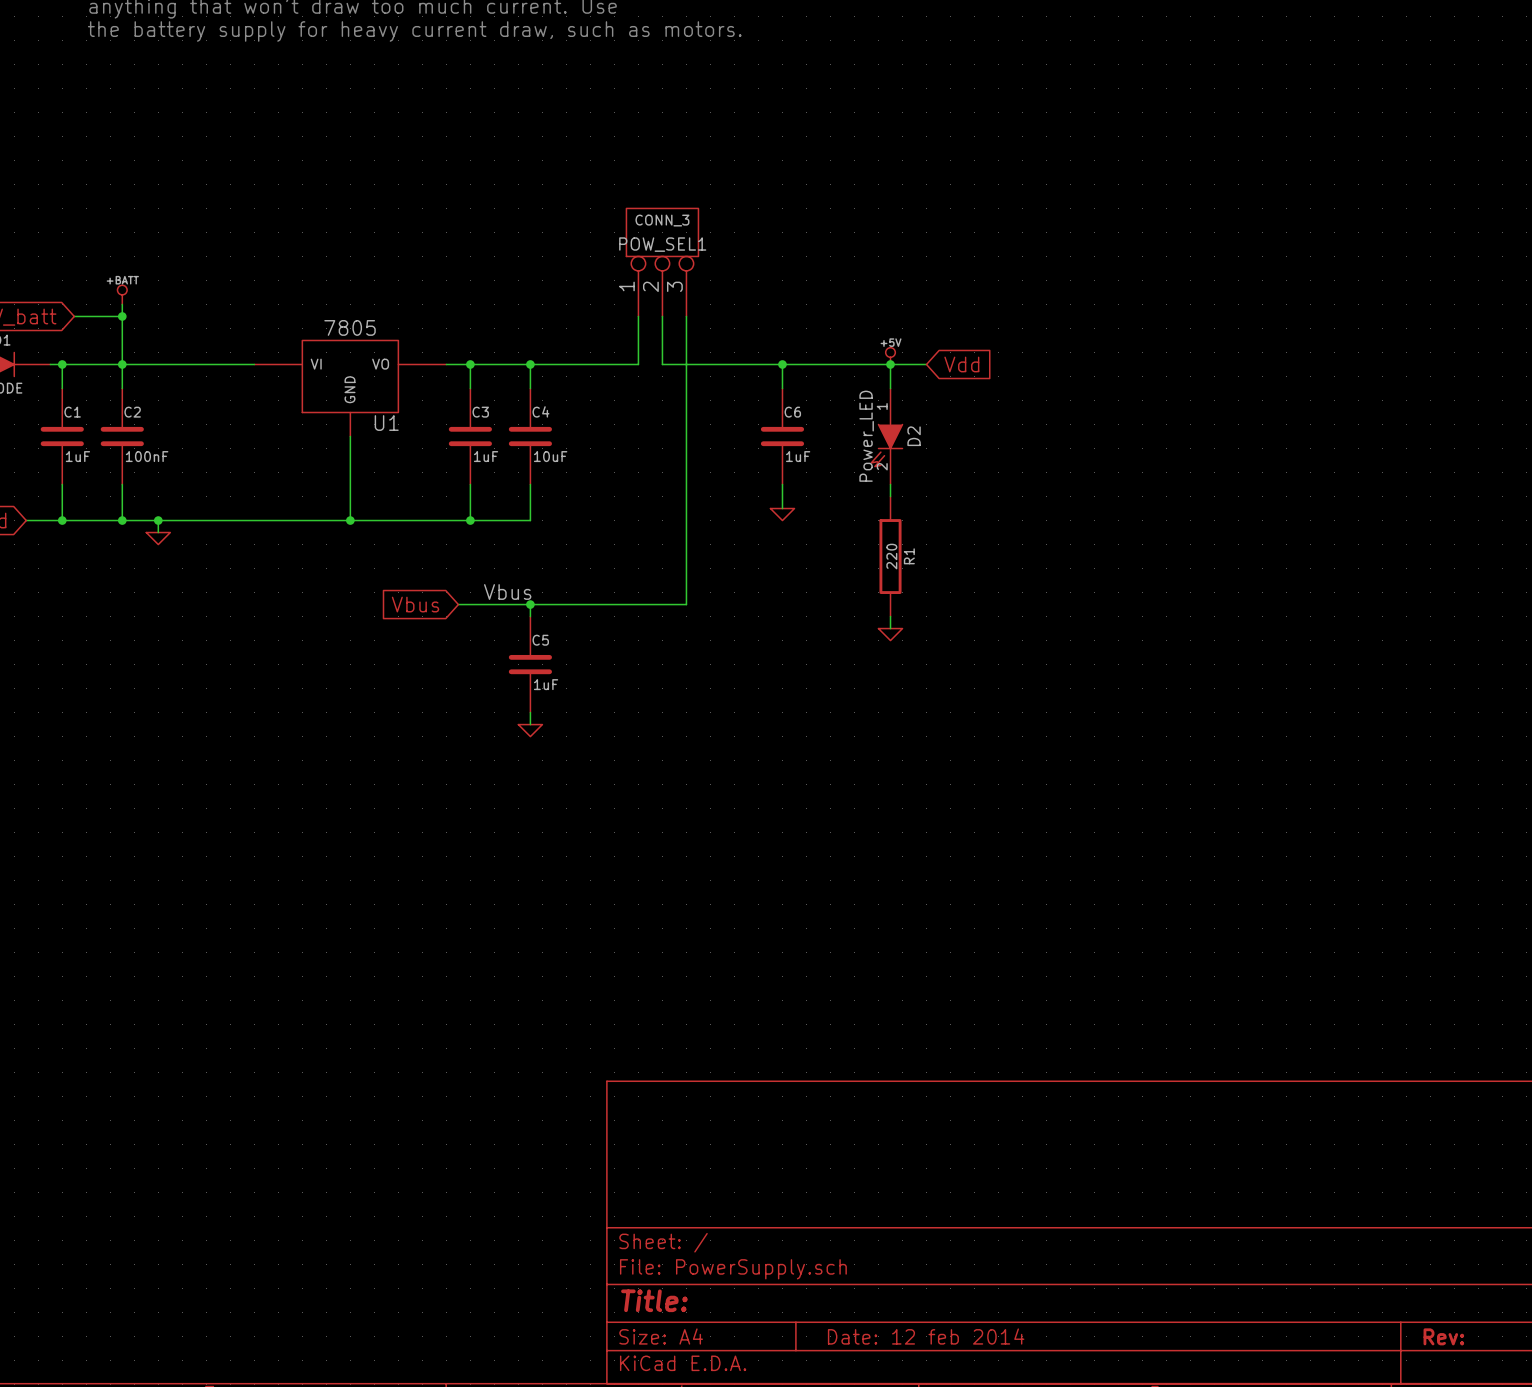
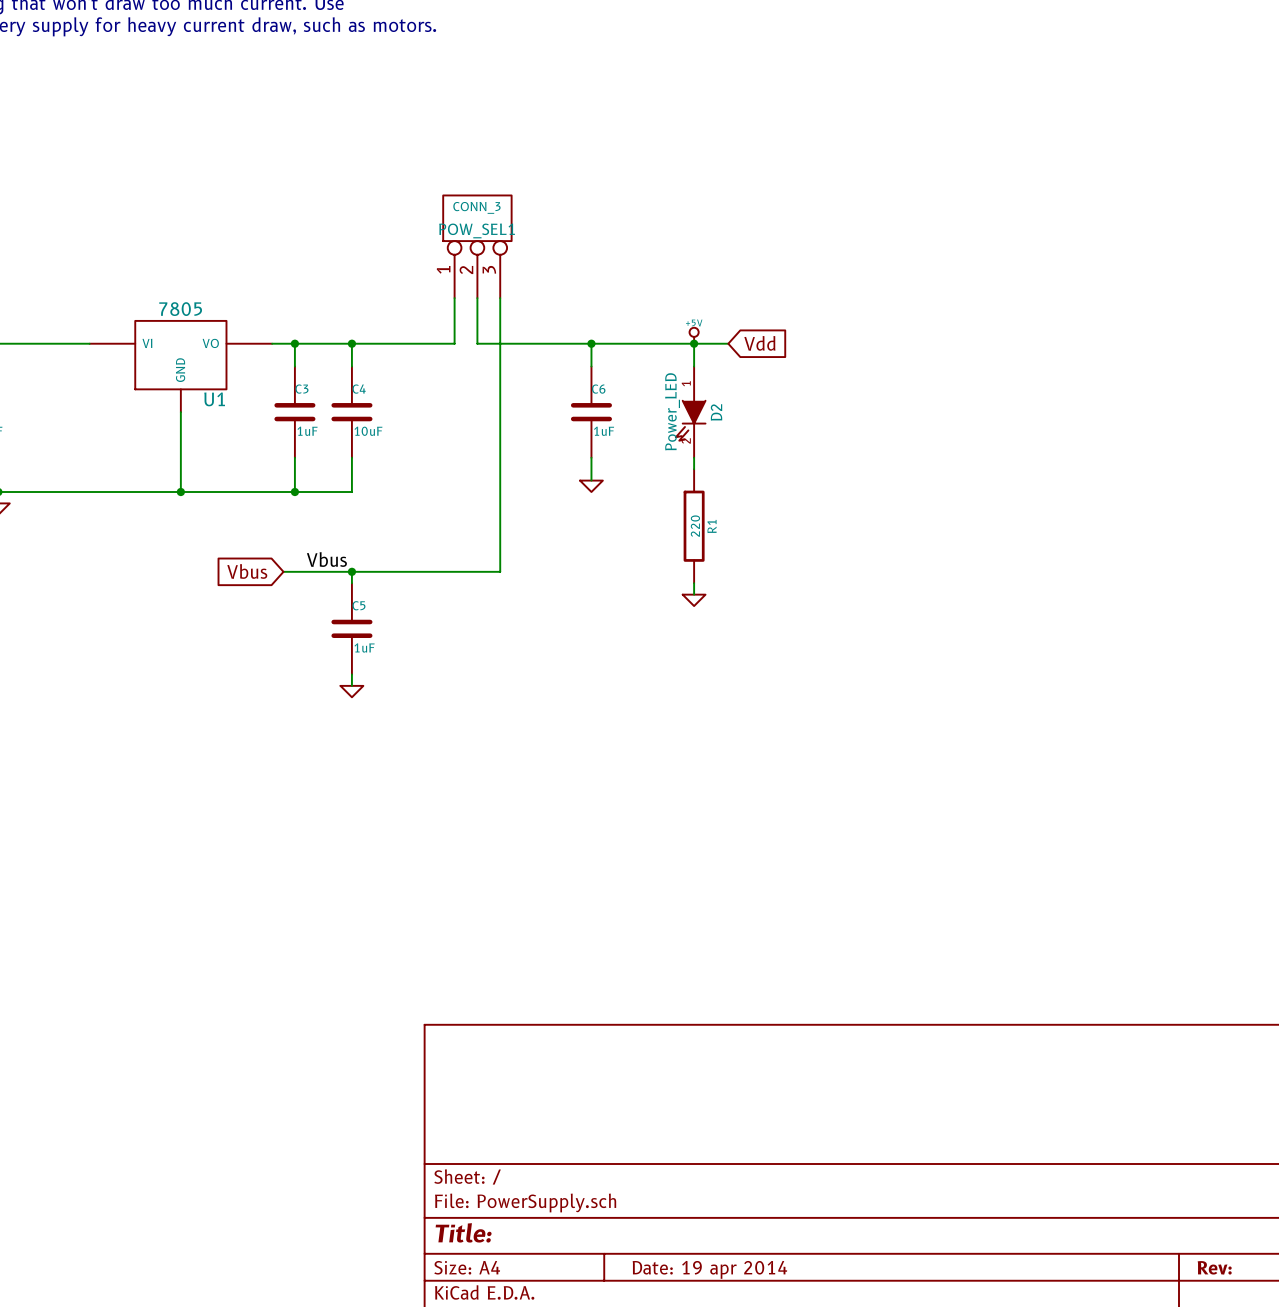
title block: Date: 12 feb 2014 (926, 1336) -> Date: 19 apr 2014 (709, 1269)

